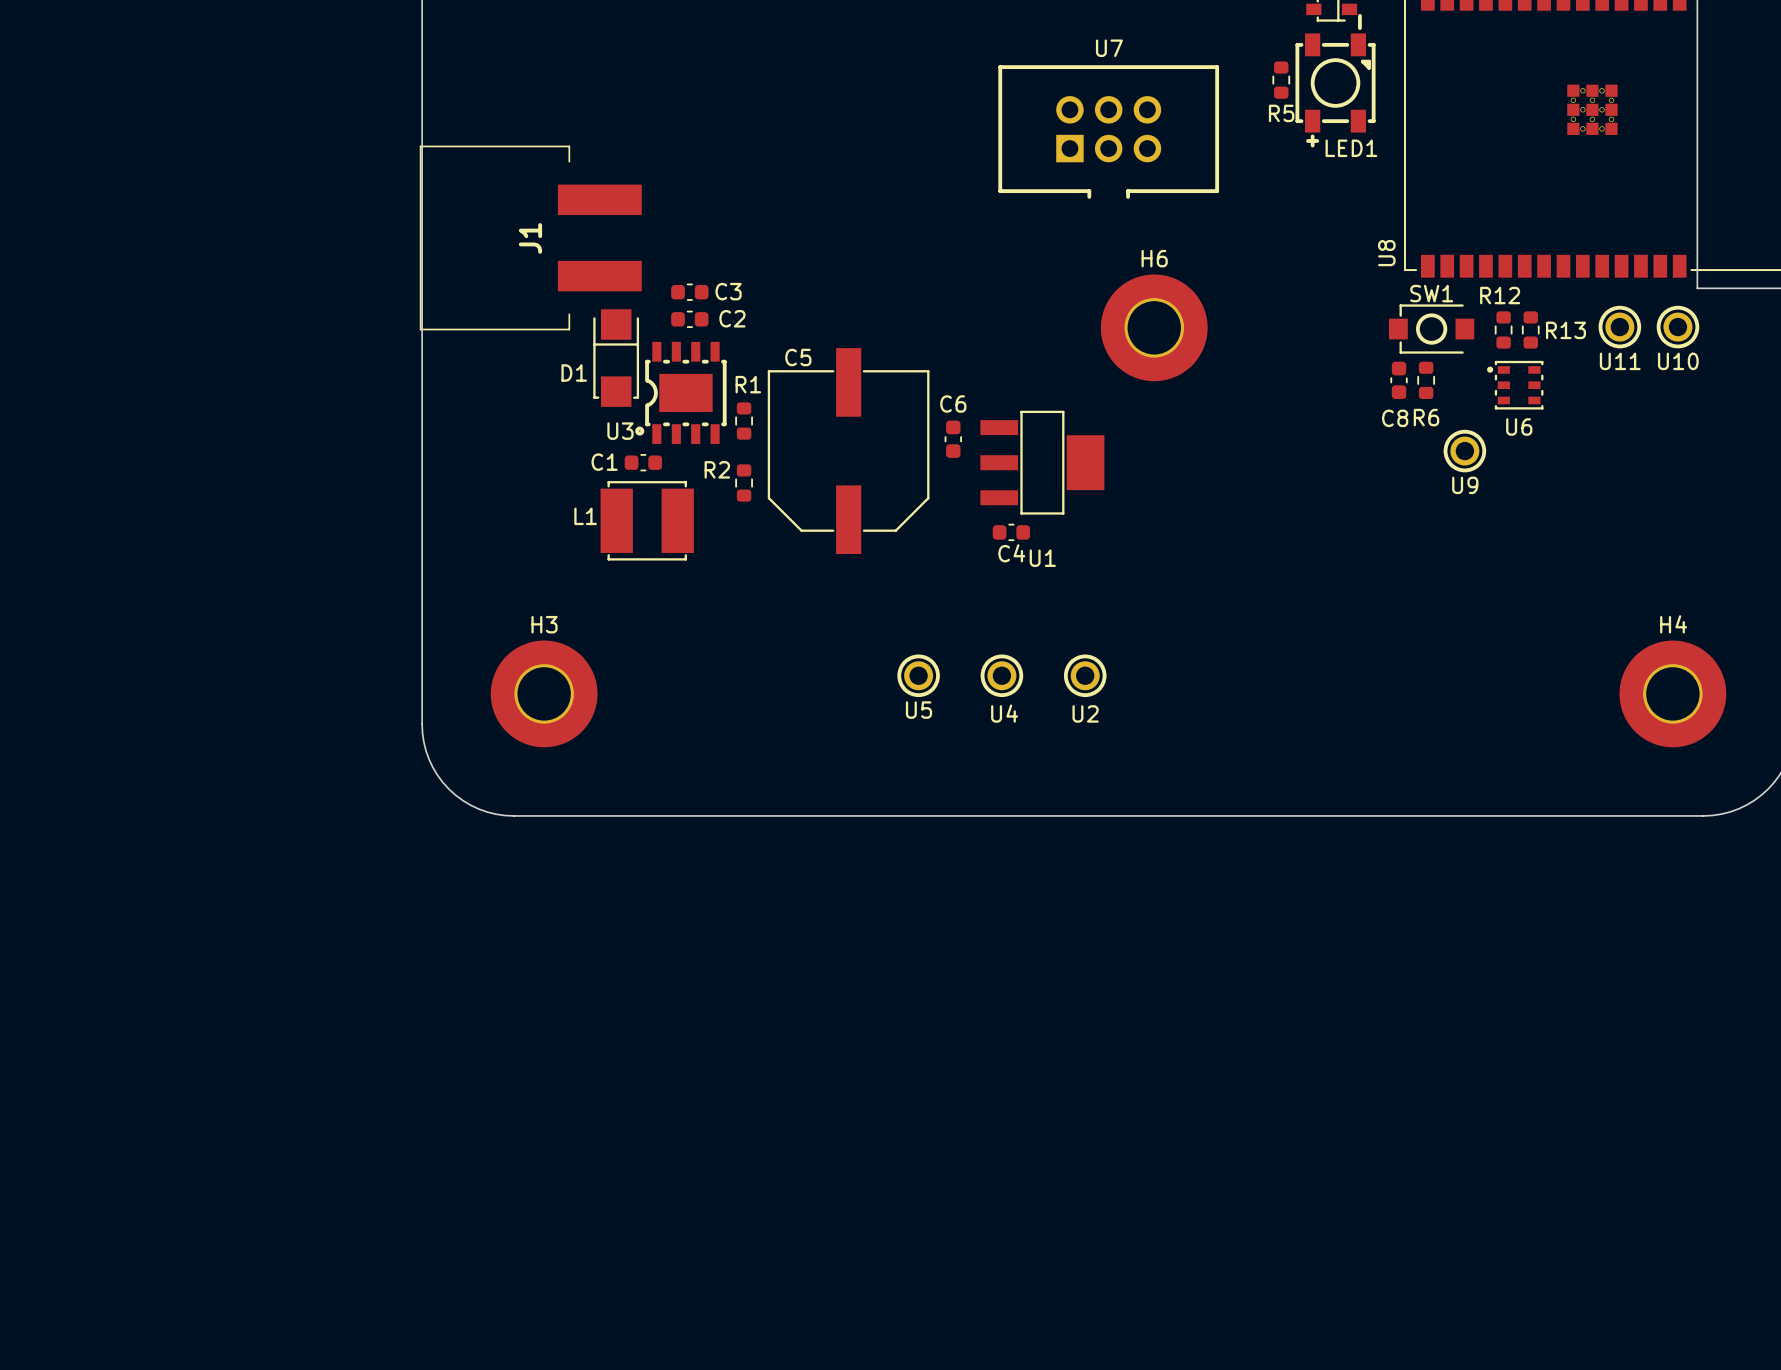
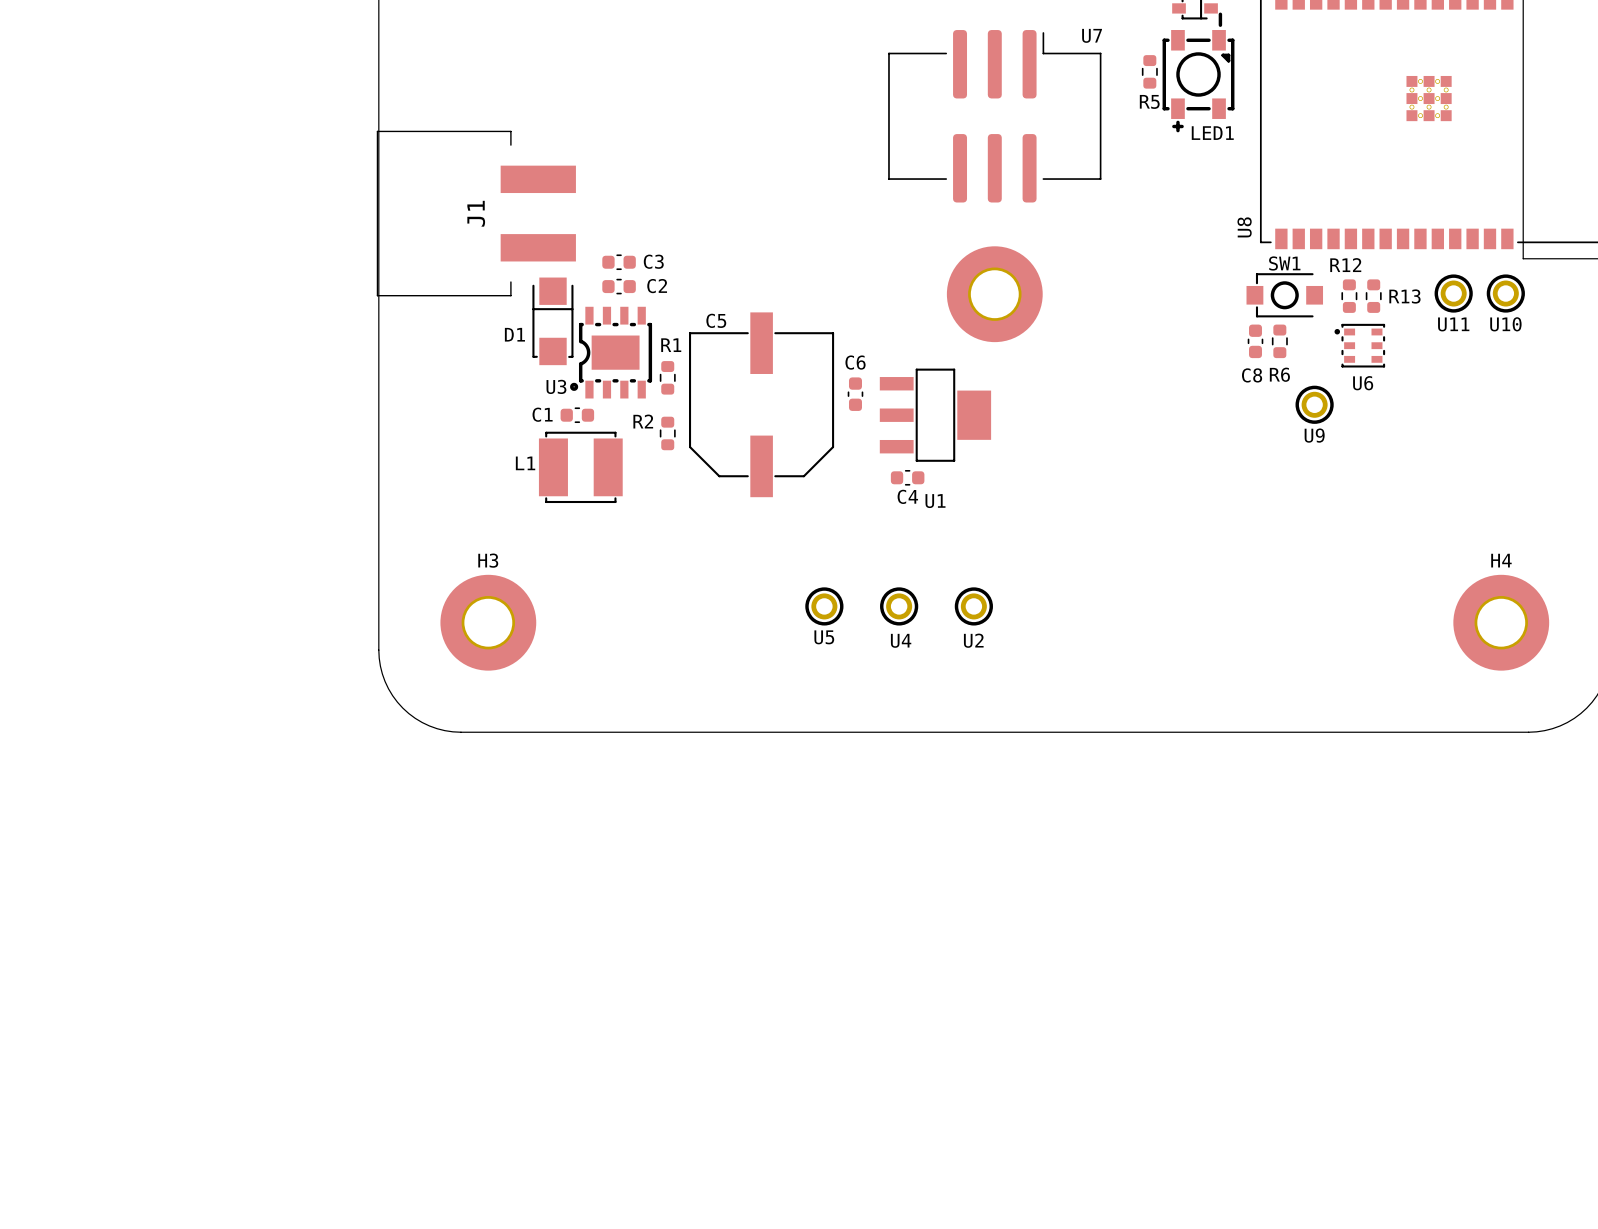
U7 name position: U7 (1109, 48) -> U7 (1092, 35)
U7 footprint: [998, 65, 1220, 199] -> [888, 30, 1102, 203]
part: none -> (994, 294)
H6: (1154, 327) -> none

